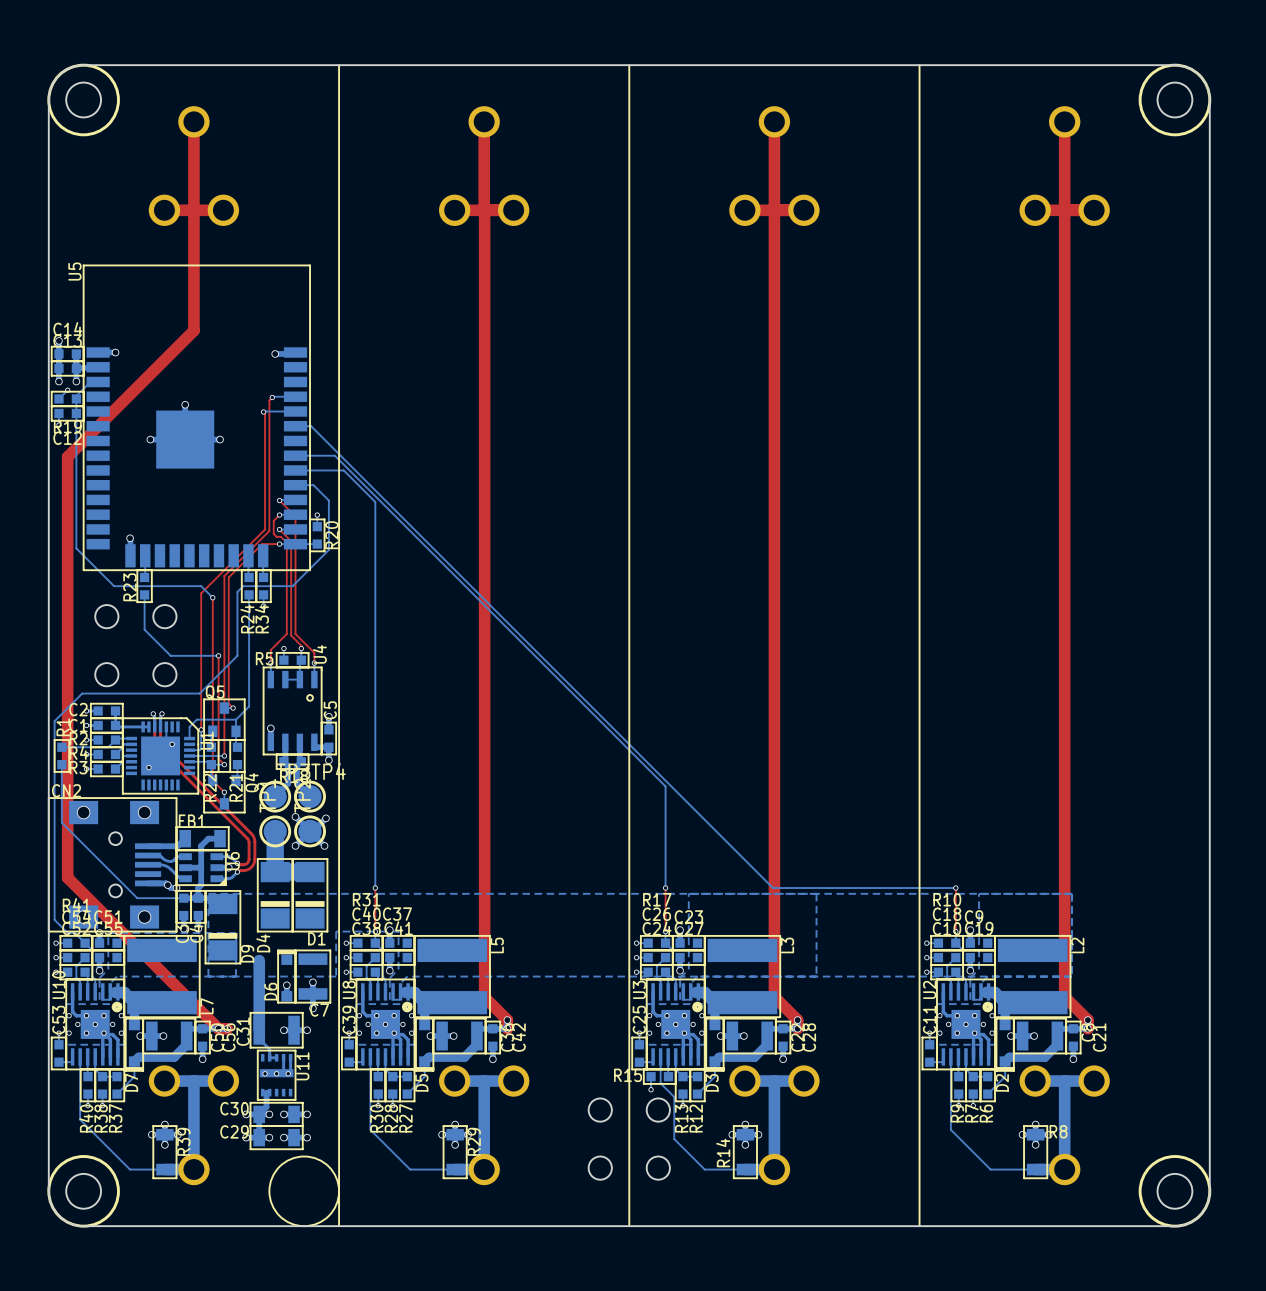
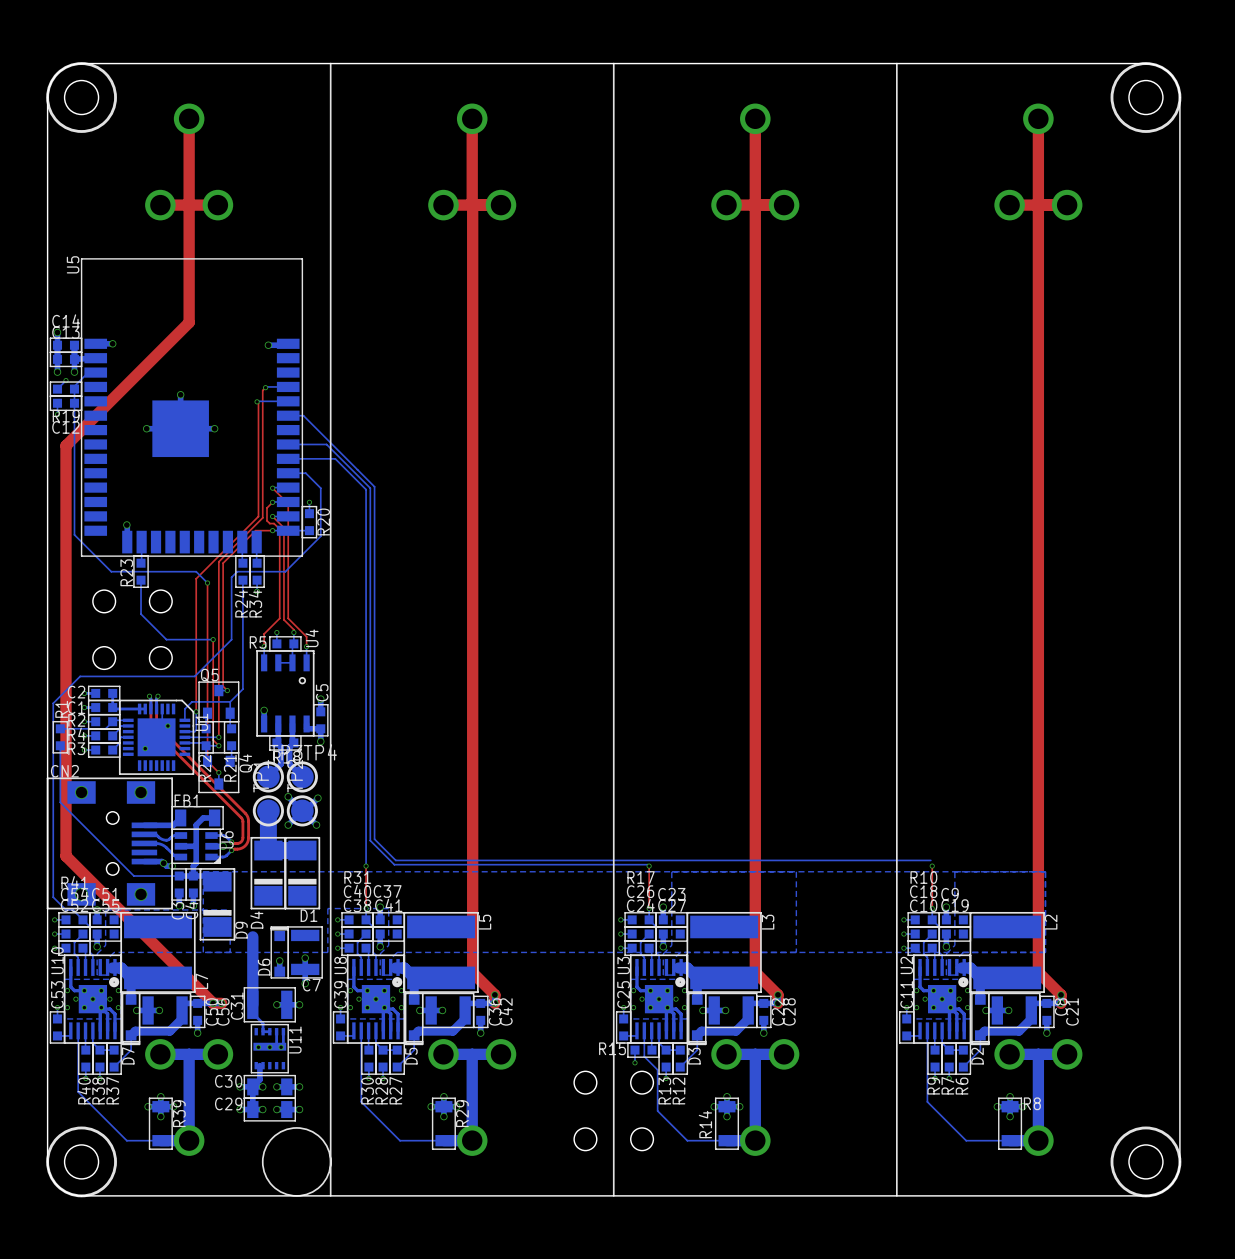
bottom track: (384, 499) (772, 888) (955, 888) -> (374, 486) (374, 839) (395, 860) (930, 860)
bottom track: (379, 500) (665, 786) (665, 888) -> (370, 488) (370, 840) (394, 864) (649, 866)

